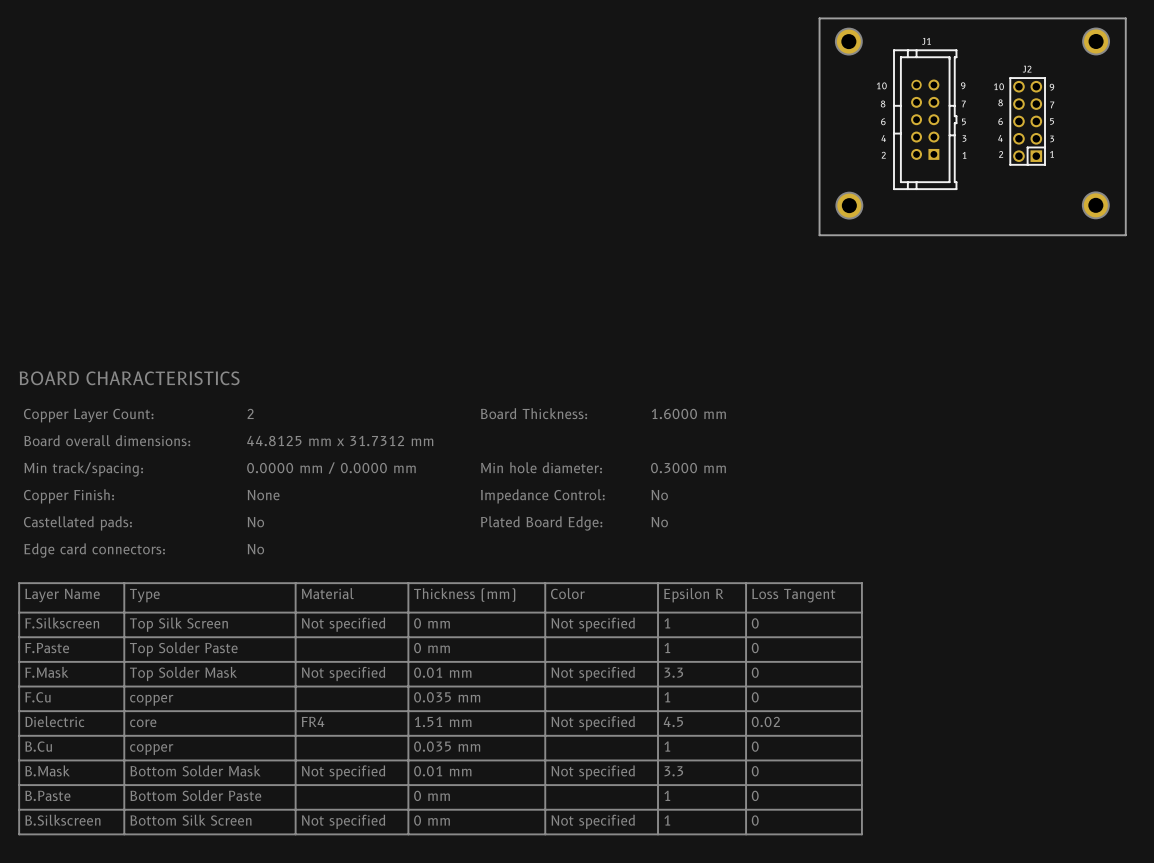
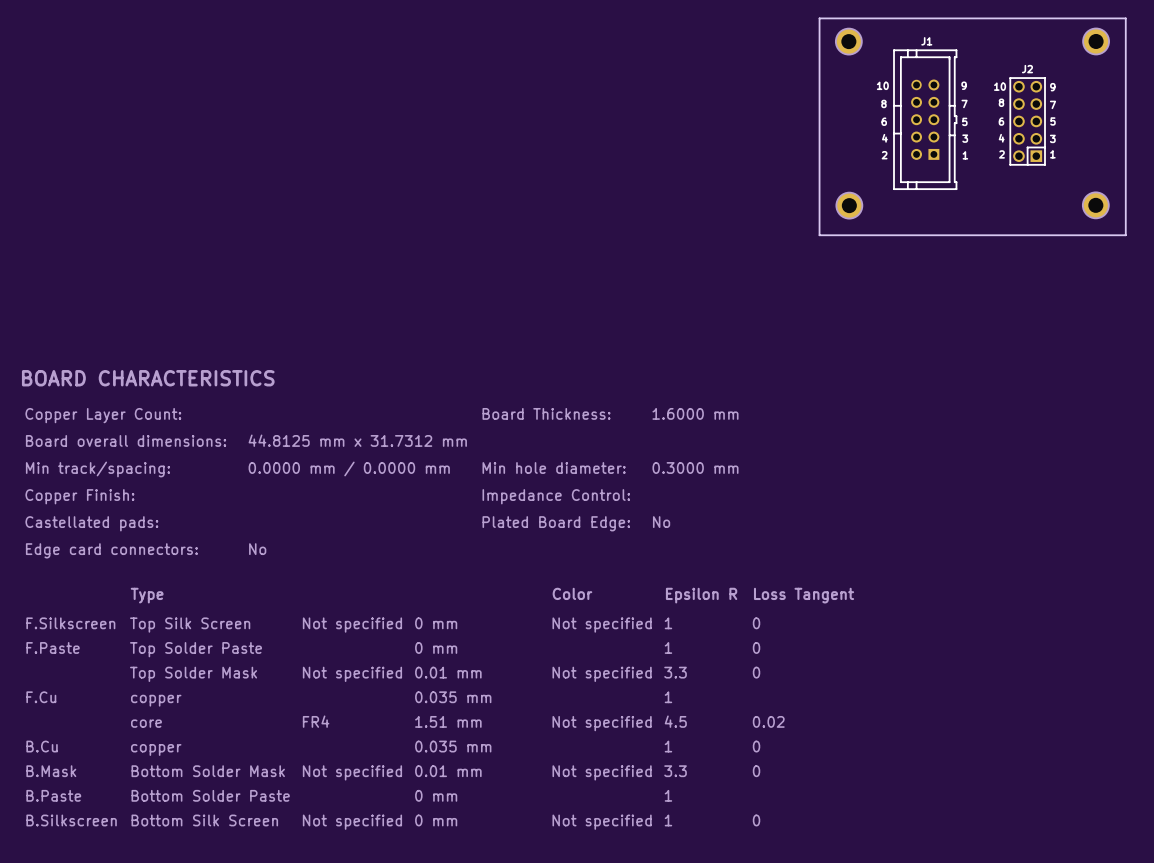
text: 2 (250, 413) -> none
text: None (263, 495) -> none
text: No (659, 495) -> none
text: No (255, 522) -> none
line: (19, 583) (19, 834) (861, 834) (861, 583) (19, 583) -> none
line: (124, 583) (124, 834) -> none
line: (295, 583) (295, 834) -> none
line: (408, 583) (408, 834) -> none
line: (545, 583) (545, 834) -> none
line: (658, 583) (658, 834) -> none
line: (746, 583) (746, 834) -> none
text: Material (327, 593) -> none
text: Thickness (mm) (464, 594) -> none
text: Layer Name (62, 595) -> none
line: (19, 612) (861, 612) -> none
line: (19, 637) (861, 637) -> none
line: (19, 661) (861, 661) -> none
text: F.Mask (46, 672) -> none
line: (19, 686) (861, 686) -> none
text: 0 (755, 697) -> none
line: (19, 711) (861, 711) -> none
text: Dielectric (54, 721) -> none
line: (19, 735) (861, 735) -> none
line: (19, 760) (861, 760) -> none
line: (19, 785) (861, 785) -> none
text: 0 (755, 795) -> none
line: (19, 809) (861, 809) -> none

